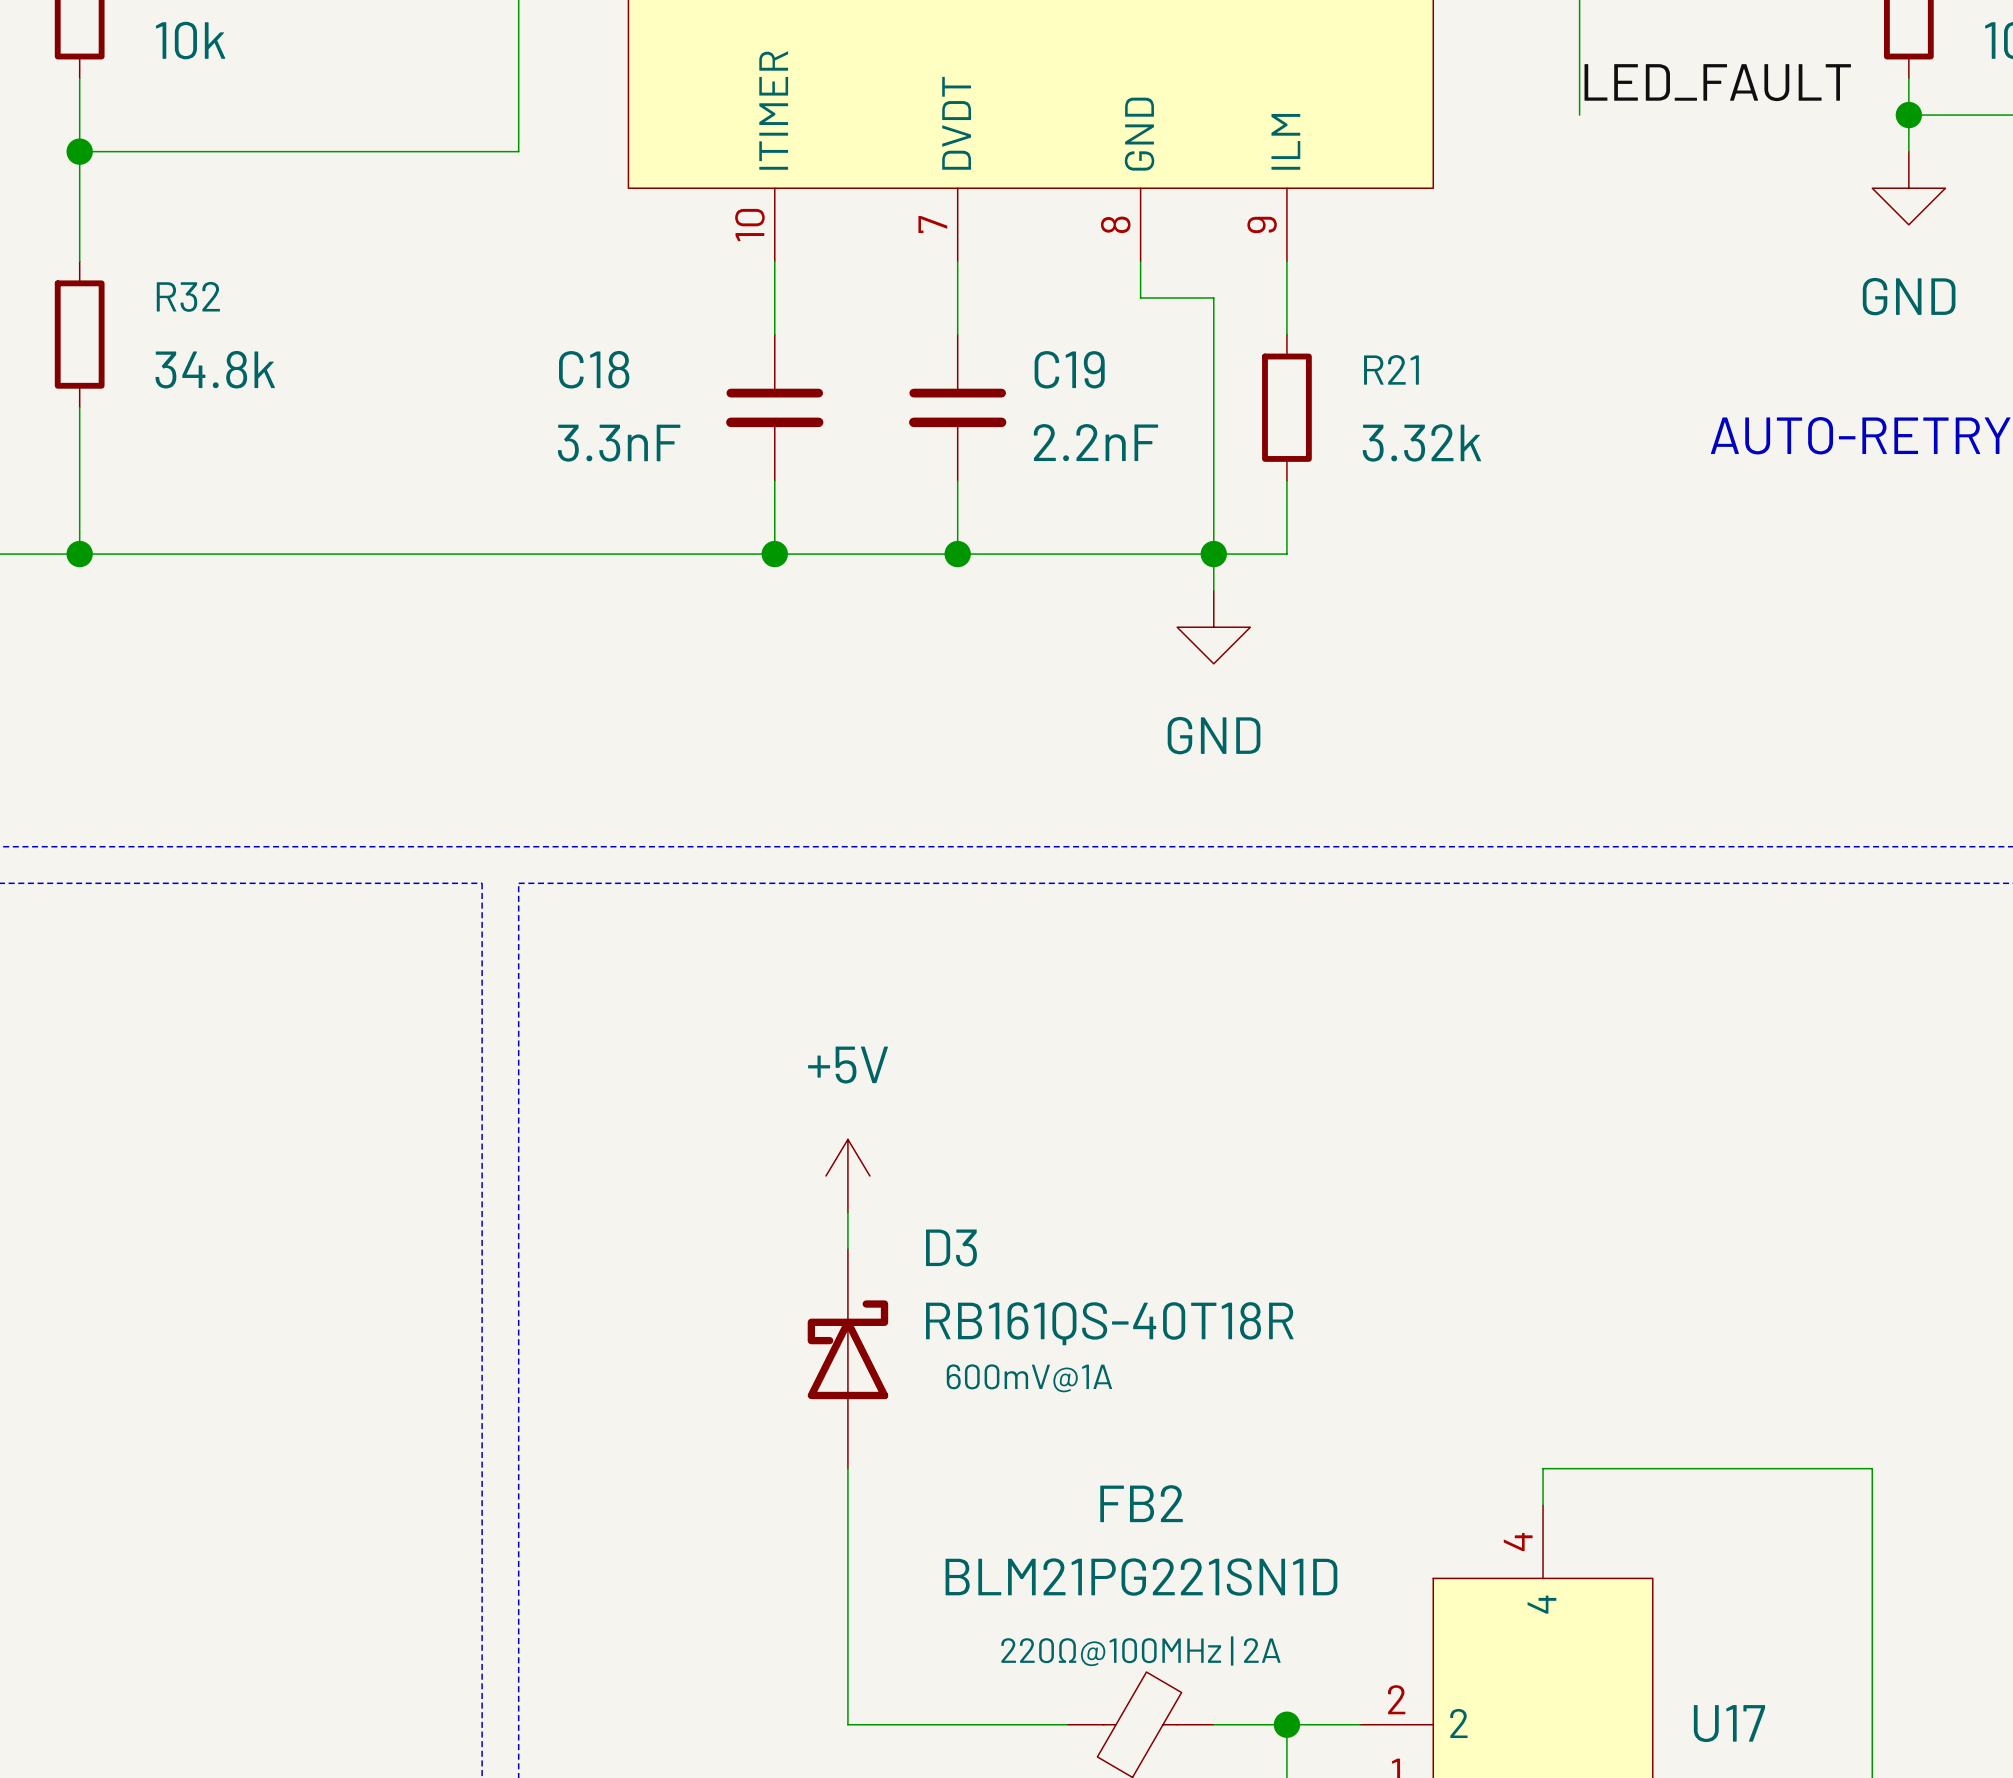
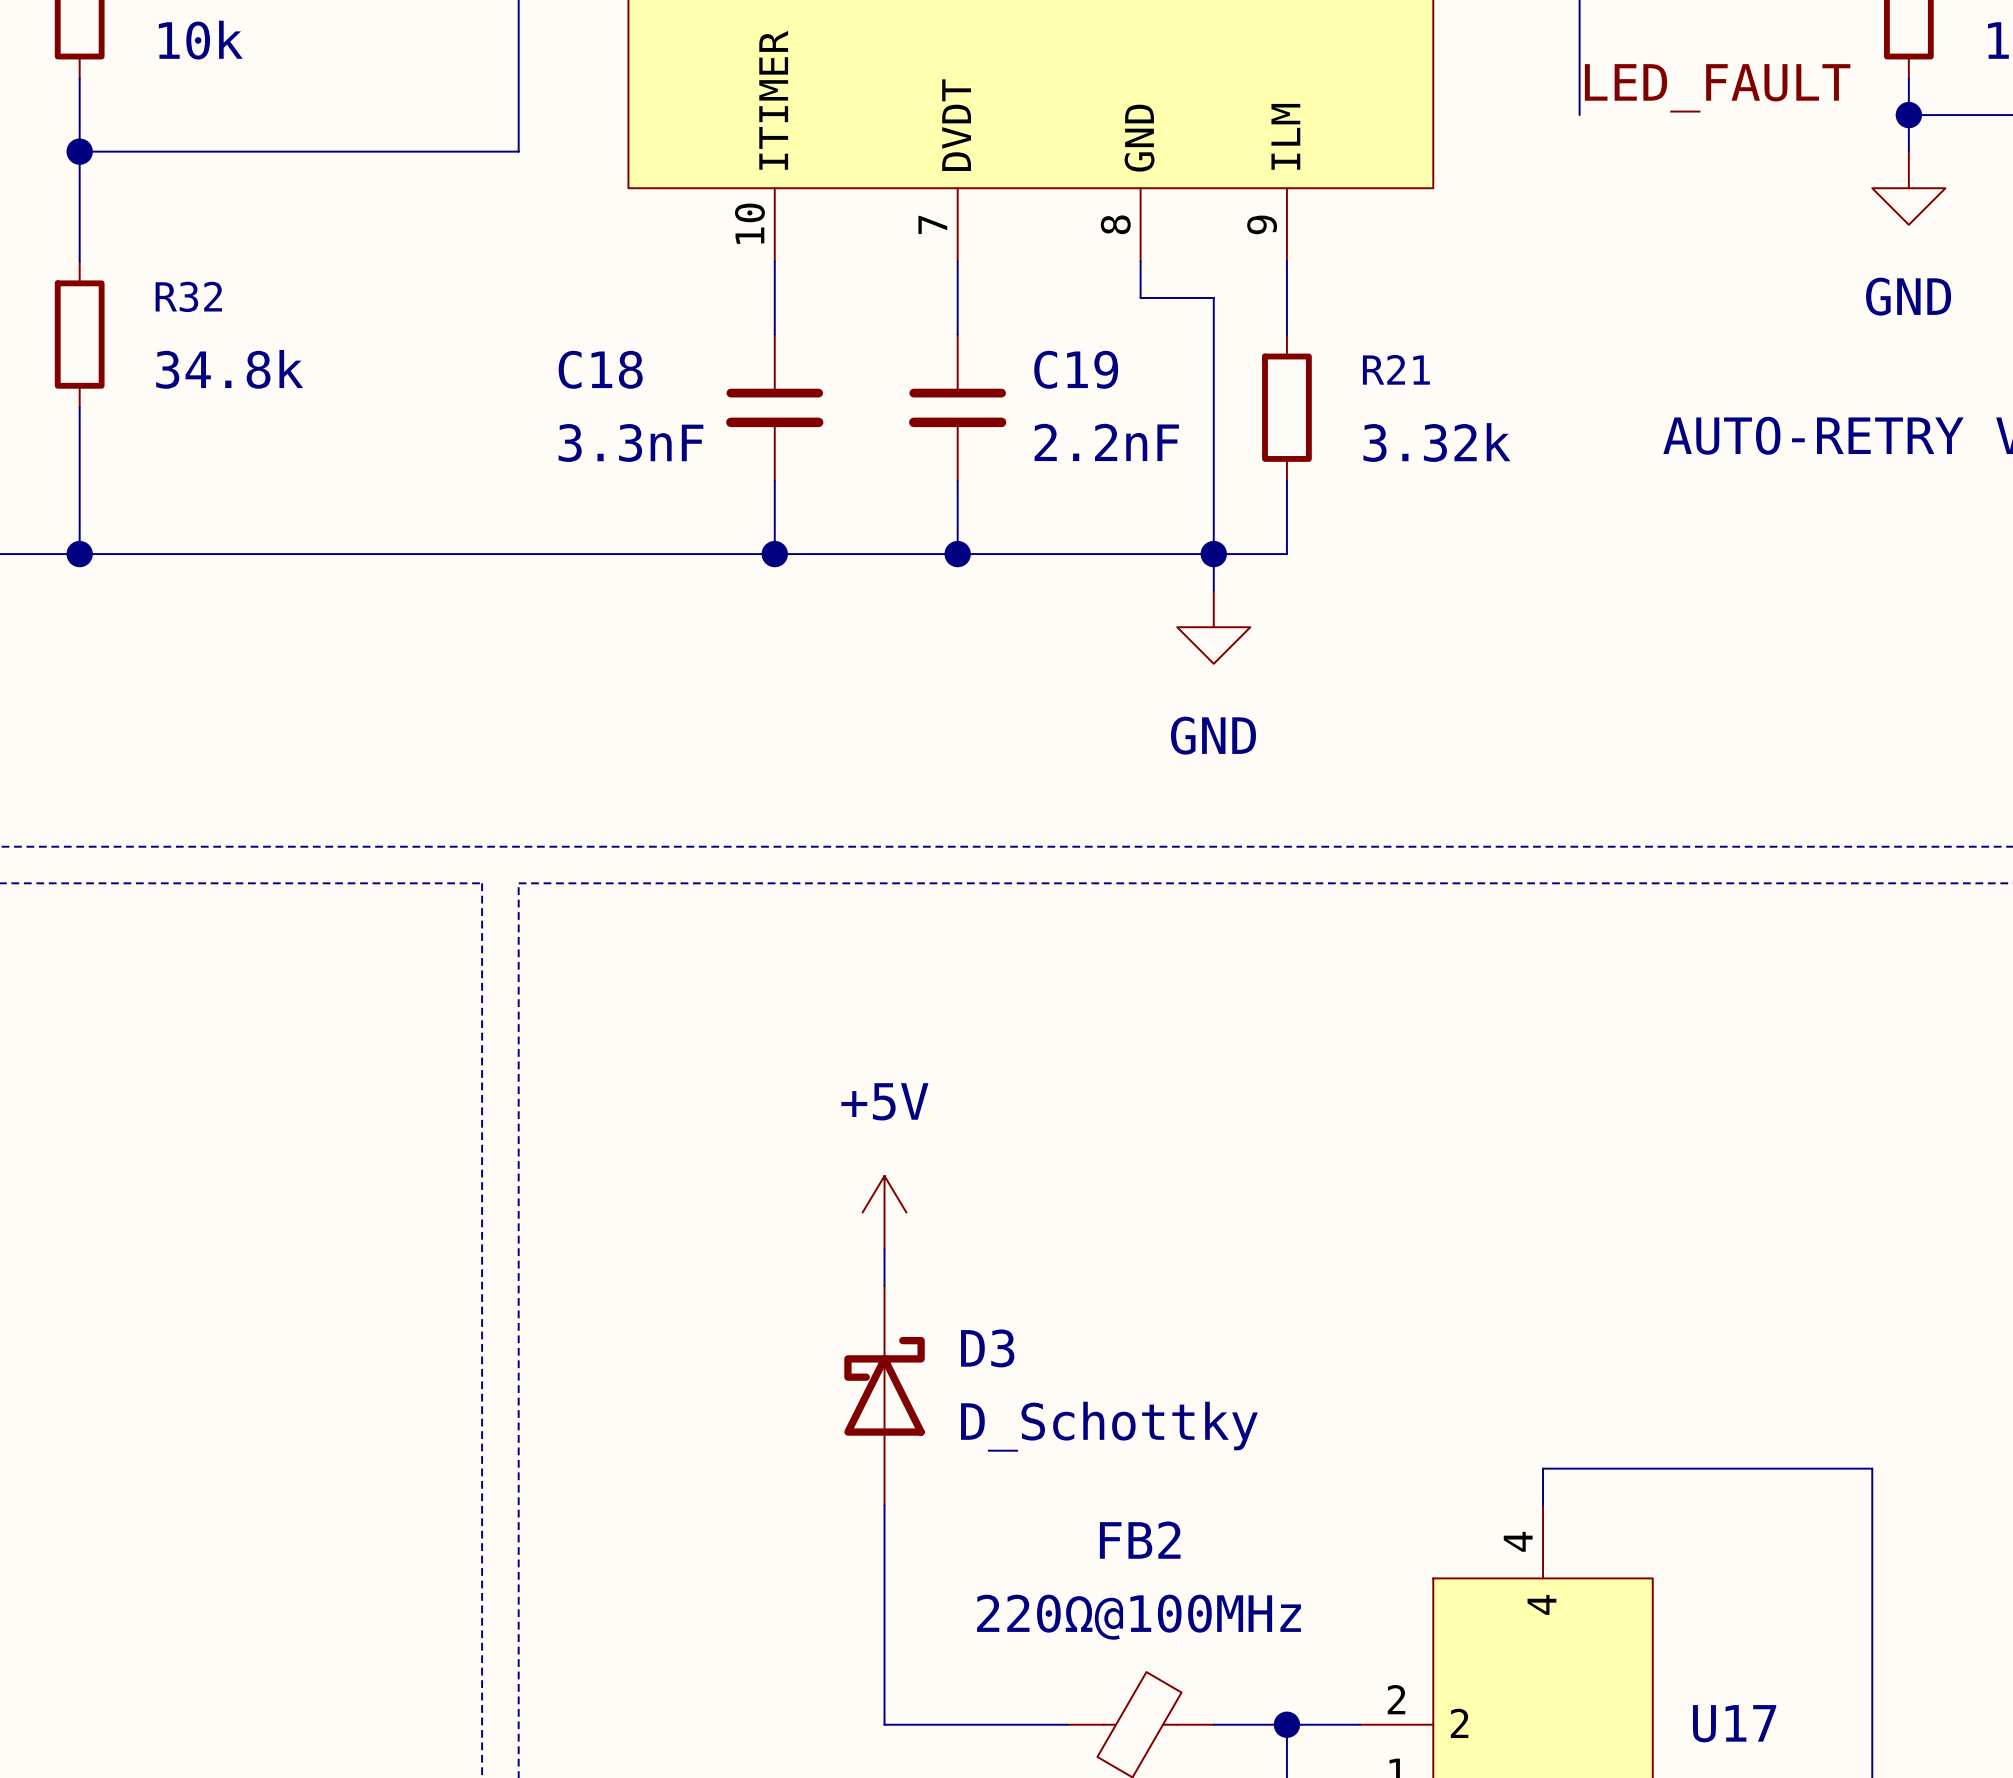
power symbol position: +5V (847, 1175) -> +5V (884, 1212)
wire: (847, 1212) (847, 1249) -> (884, 1249) (884, 1285)
D3 name position: D3 (951, 1247) -> D3 (987, 1348)
D3 value: RB161QS-40T18R (1109, 1323) -> D_Schottky (1109, 1426)
D3 position: (847, 1358) -> (884, 1395)
D3 text: 600mV@1A (1029, 1378) -> none
wire: (847, 1468) (847, 1724) (884, 1724) -> (884, 1505) (884, 1724)
FB2 name position: FB2 (1141, 1503) -> FB2 (1140, 1540)
FB2 value: BLM21PG221SN1D (1141, 1577) -> 220Ω@100MHz (1139, 1617)
FB2 text: 220Ω@100MHz | 2A (1140, 1651) -> none

